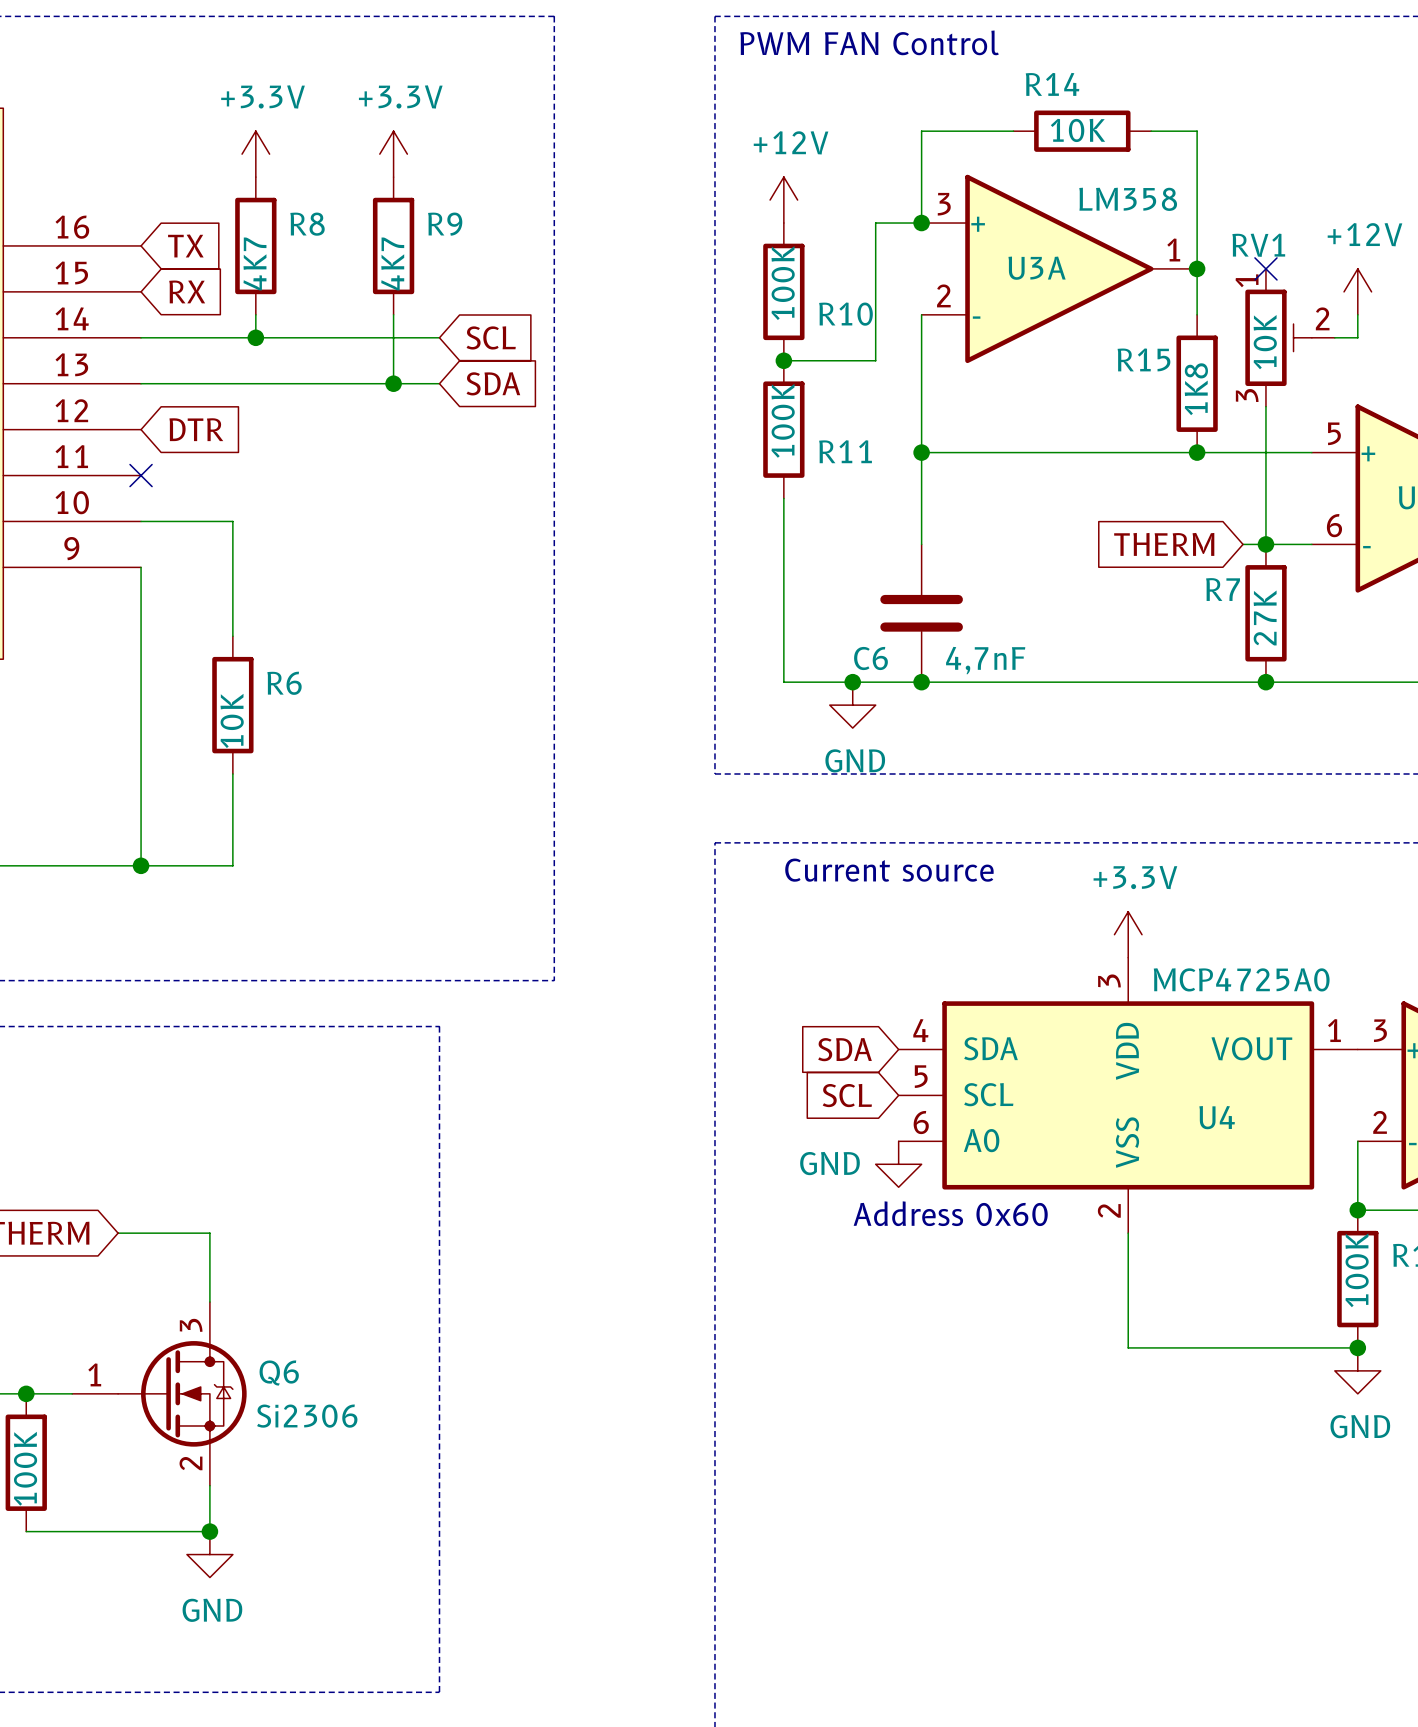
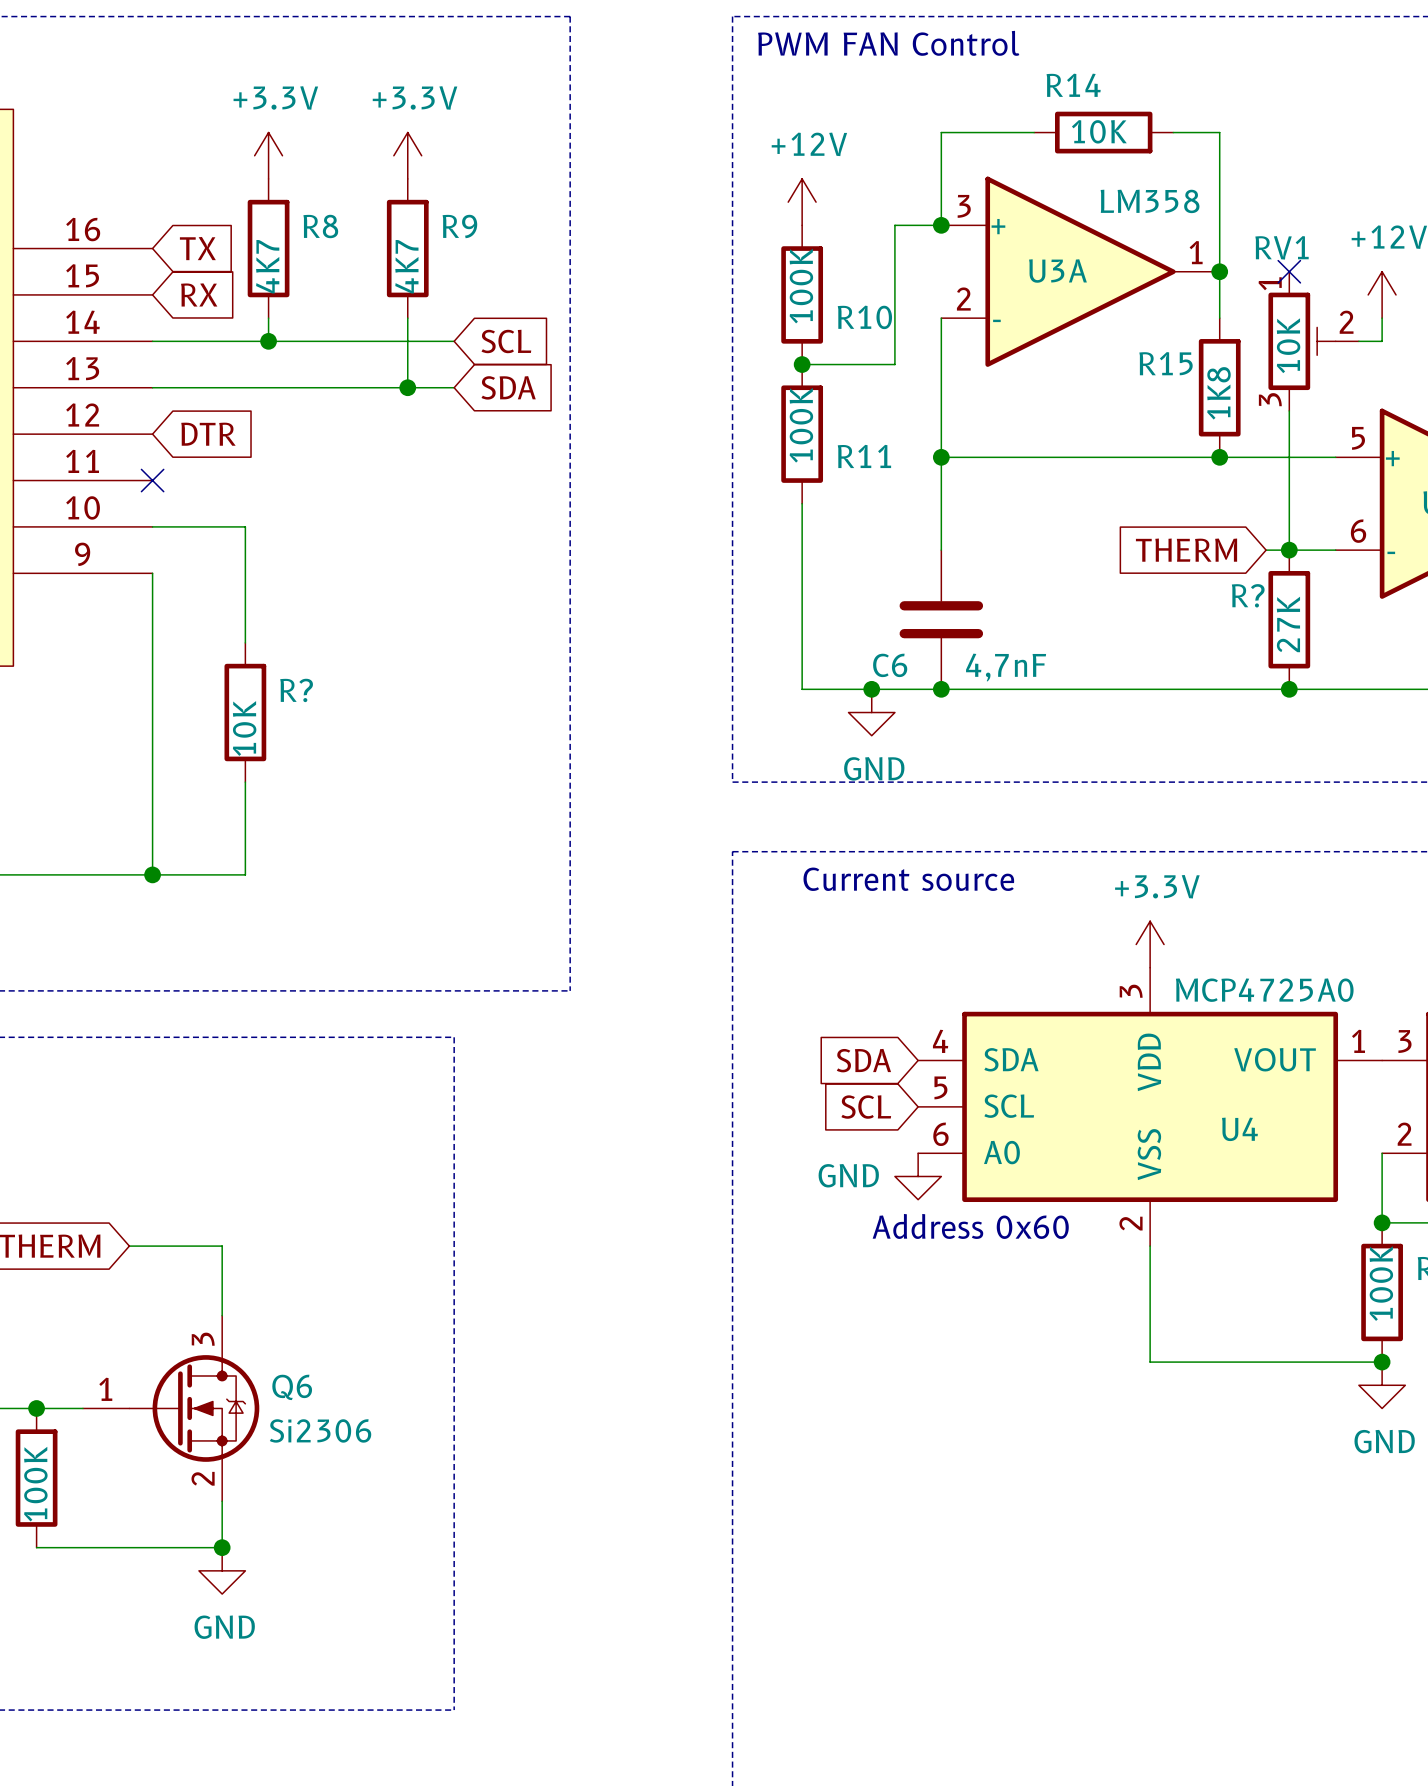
R7 name: R7 (1223, 589) -> R? (1248, 595)
R6 name: R6 (284, 683) -> R? (296, 690)

